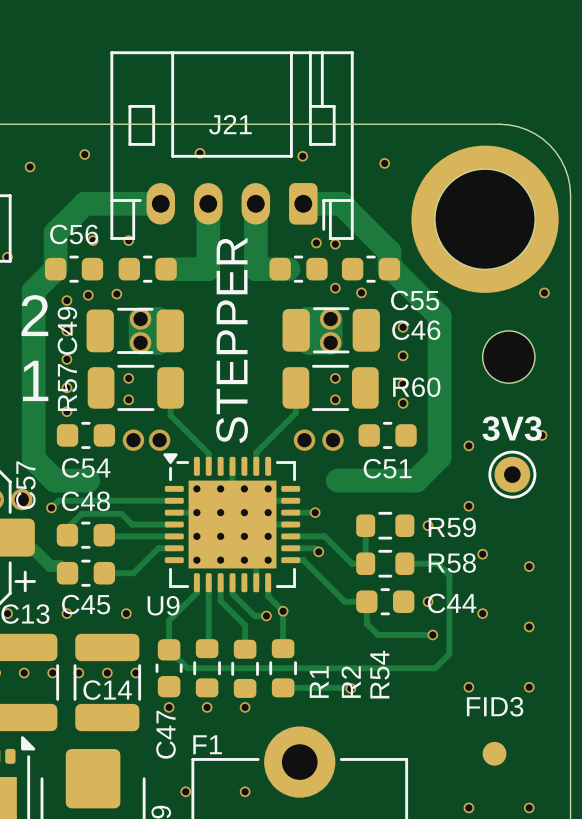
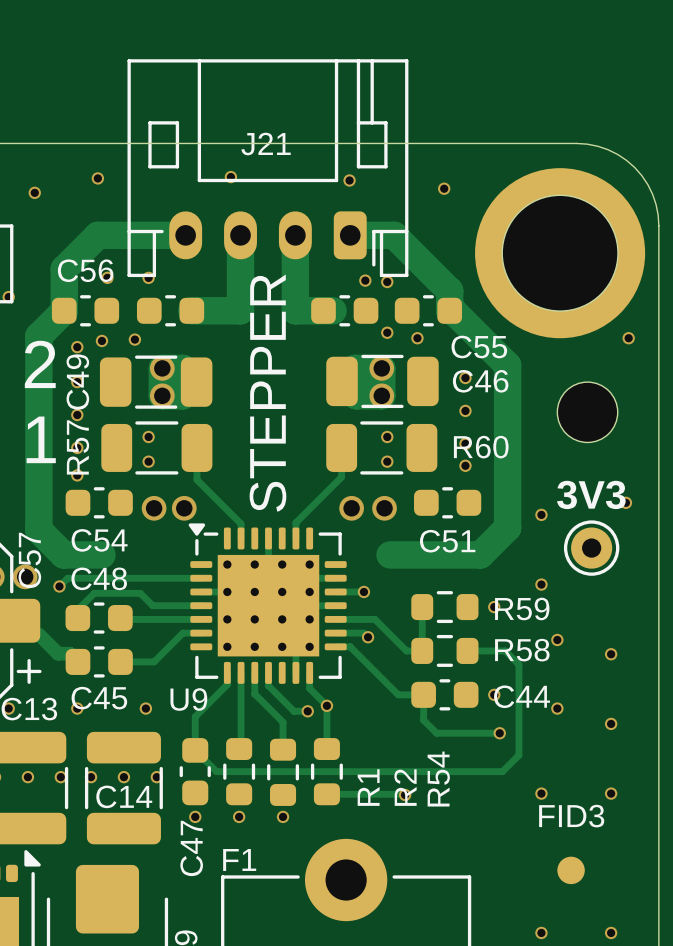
via: (185, 791) -> none
via: (245, 791) -> none

